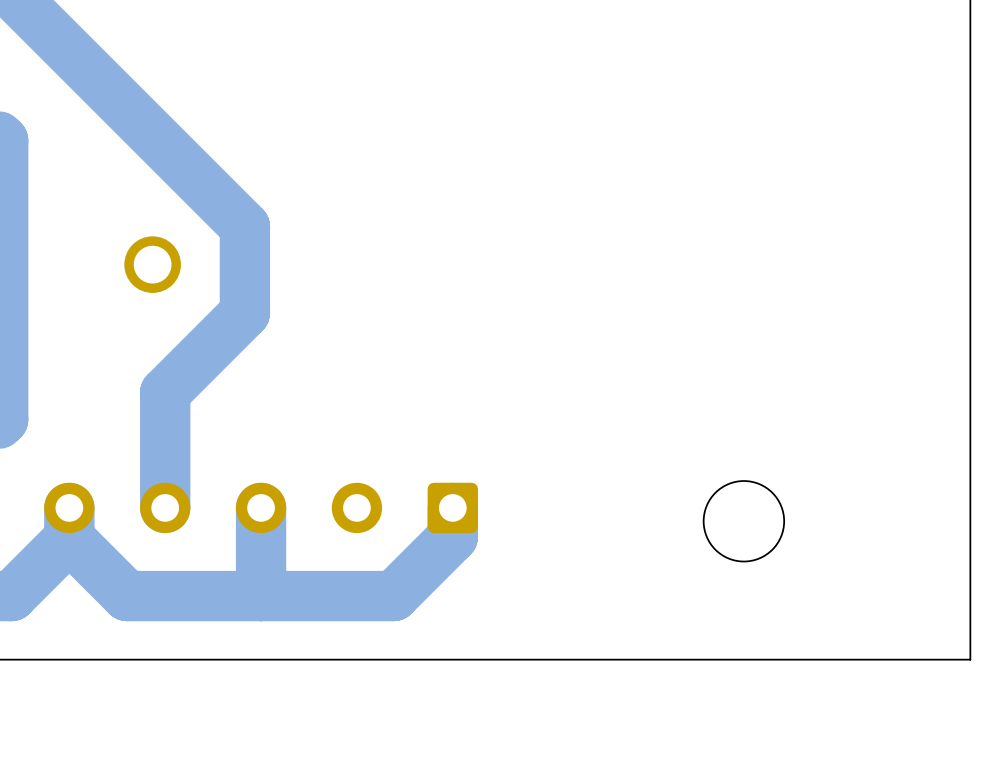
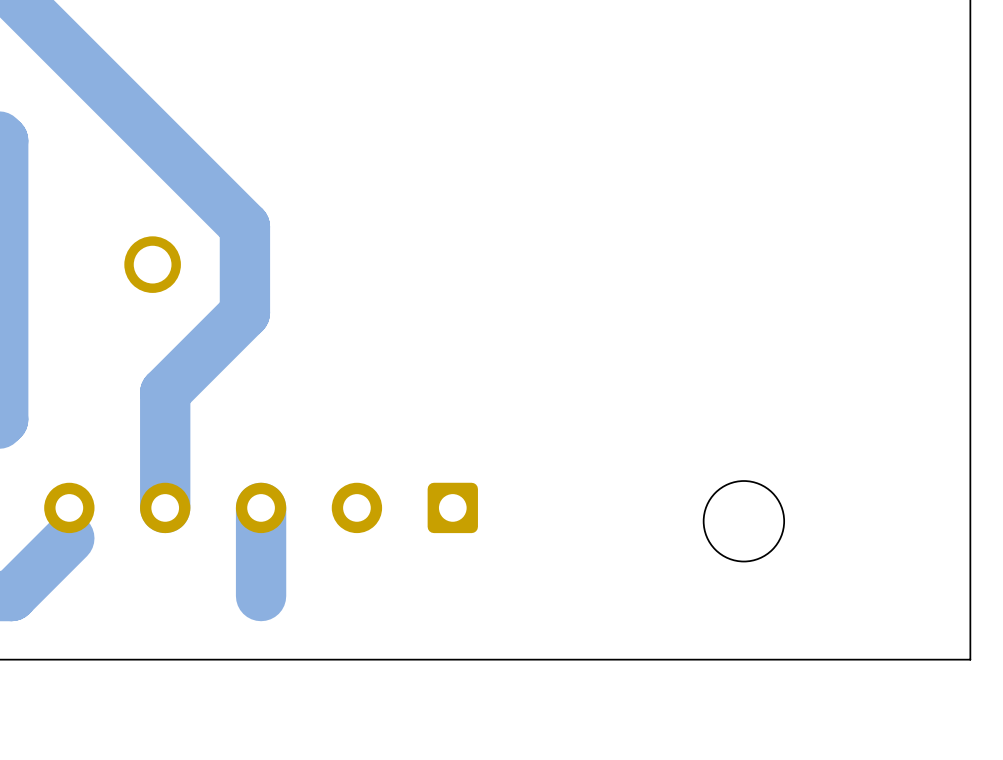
track: (452, 507) (452, 536) (393, 596) (127, 596) (69, 538) (69, 507) -> none

